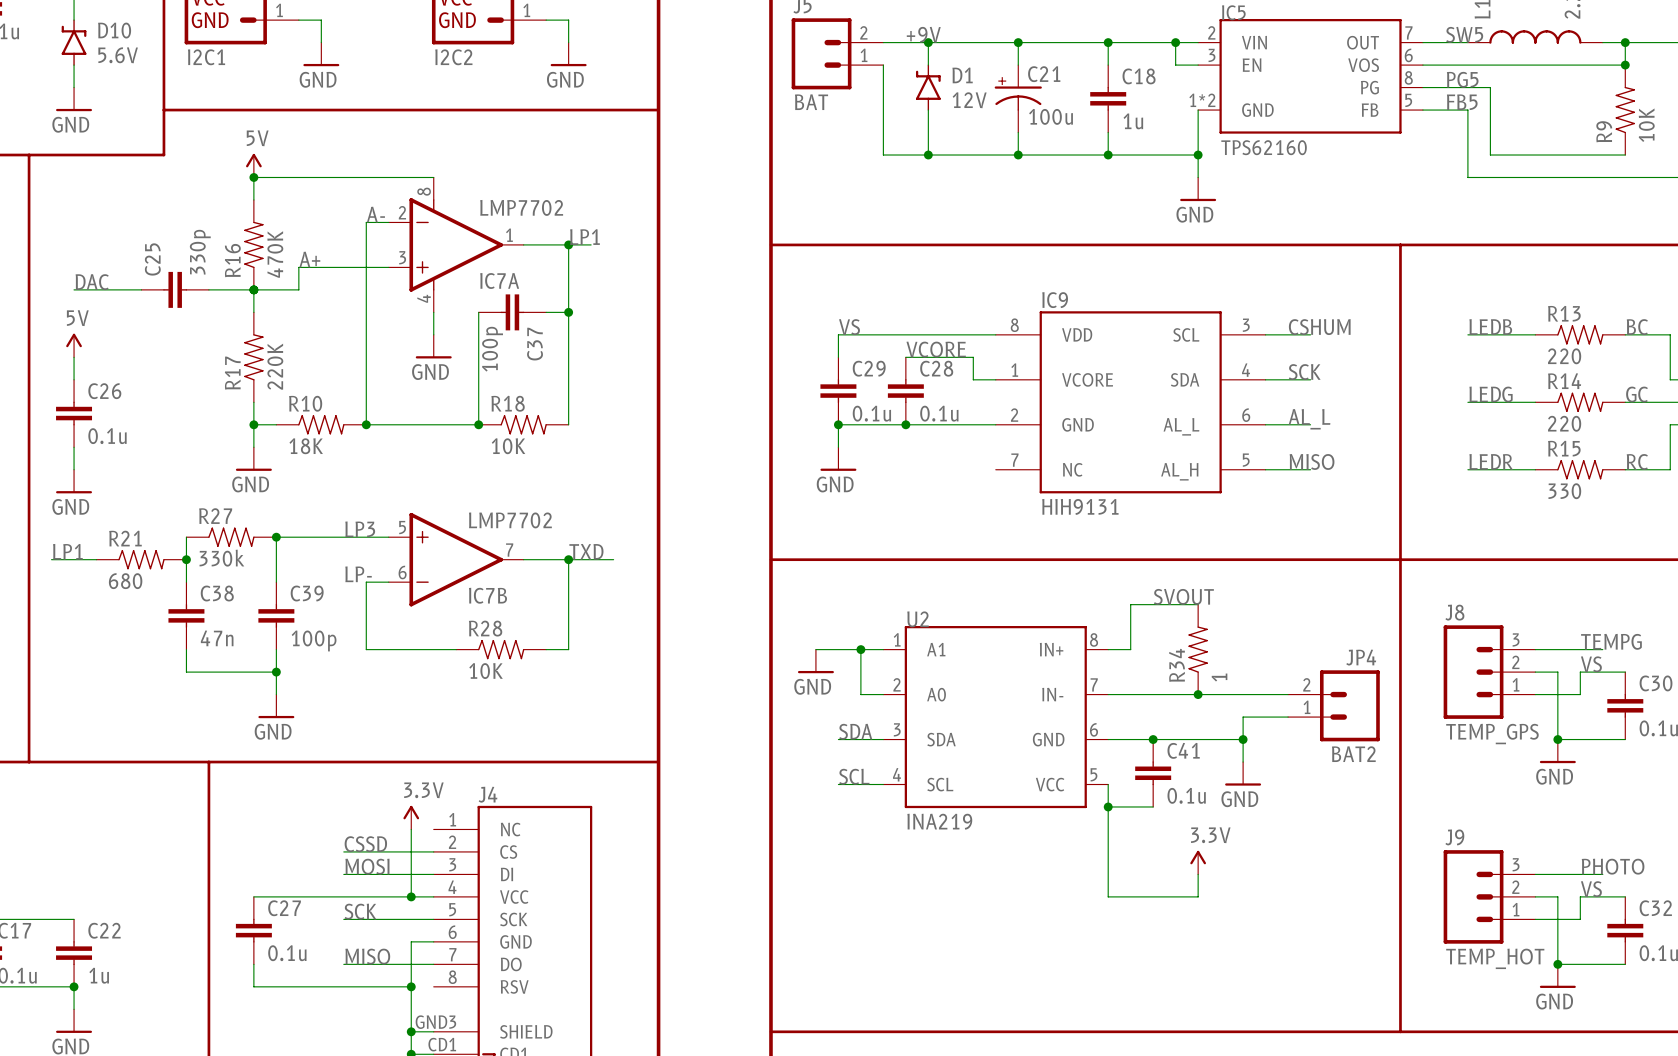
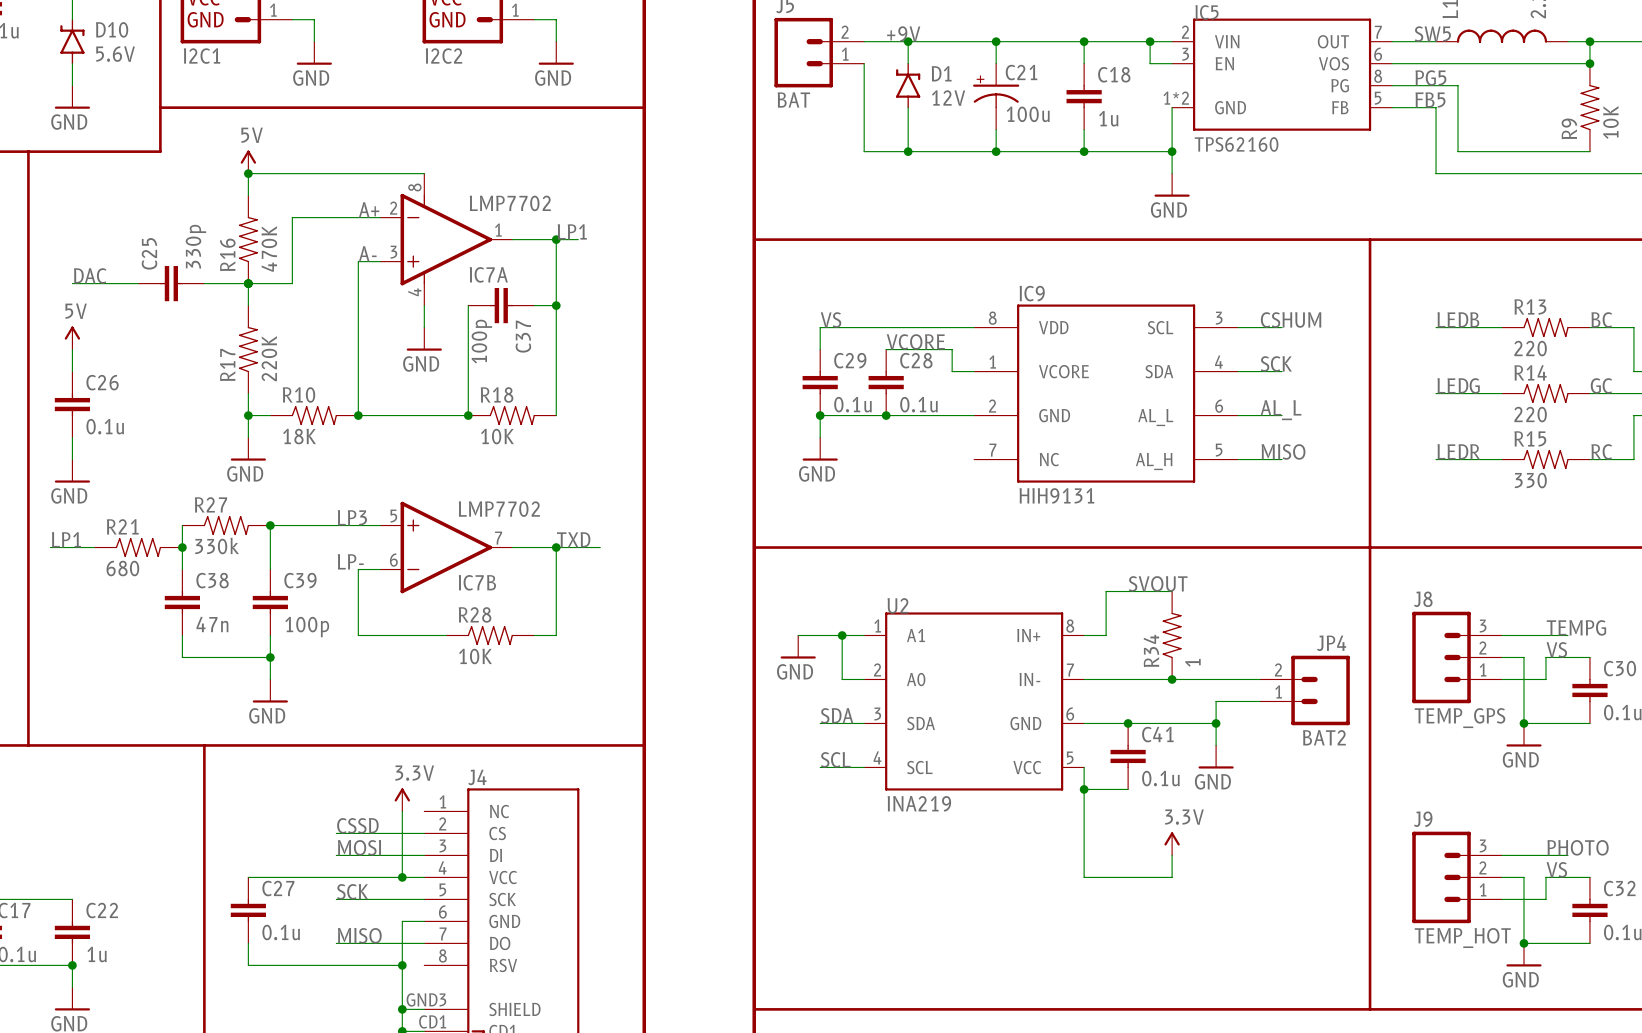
label: A- (375, 214) -> A+ (369, 209)
wire: (366, 222) (366, 267) (298, 267) -> (358, 217) (292, 217) (292, 261)
label: A+ (309, 259) -> none
label: none -> A- (367, 253)

